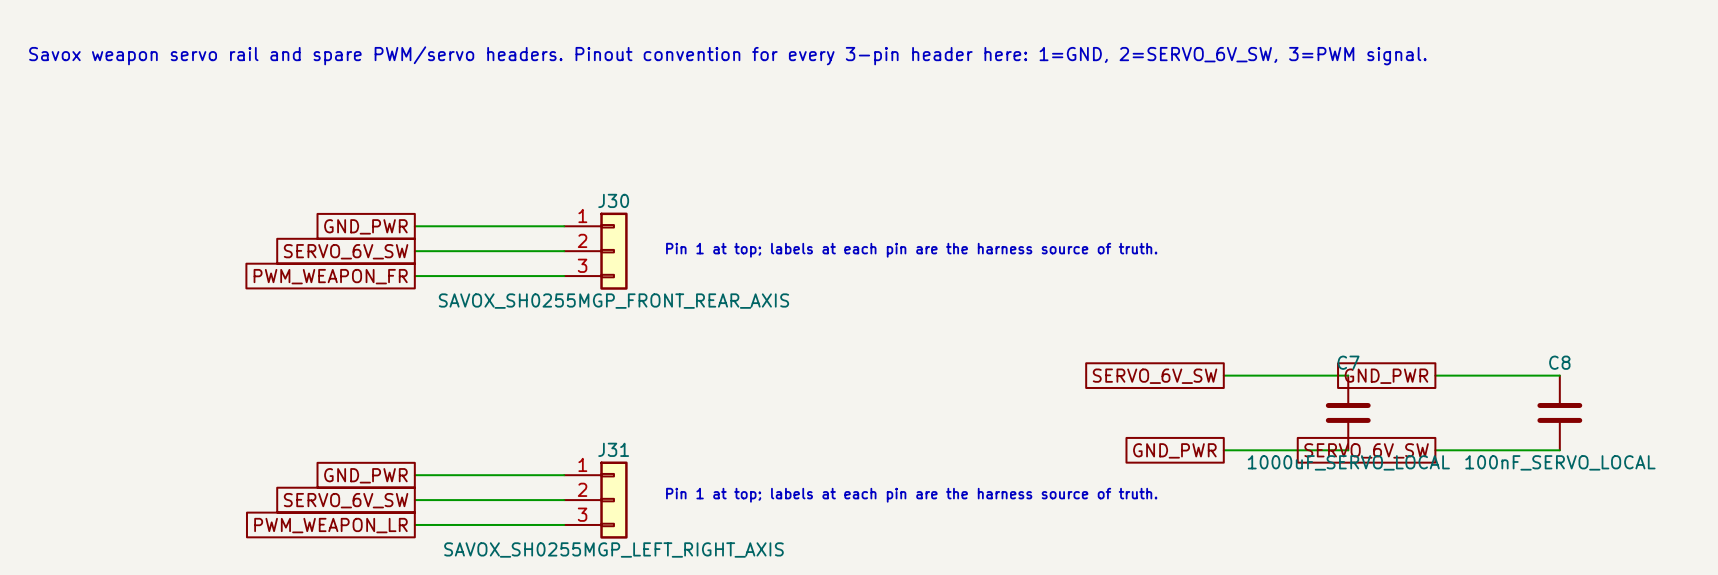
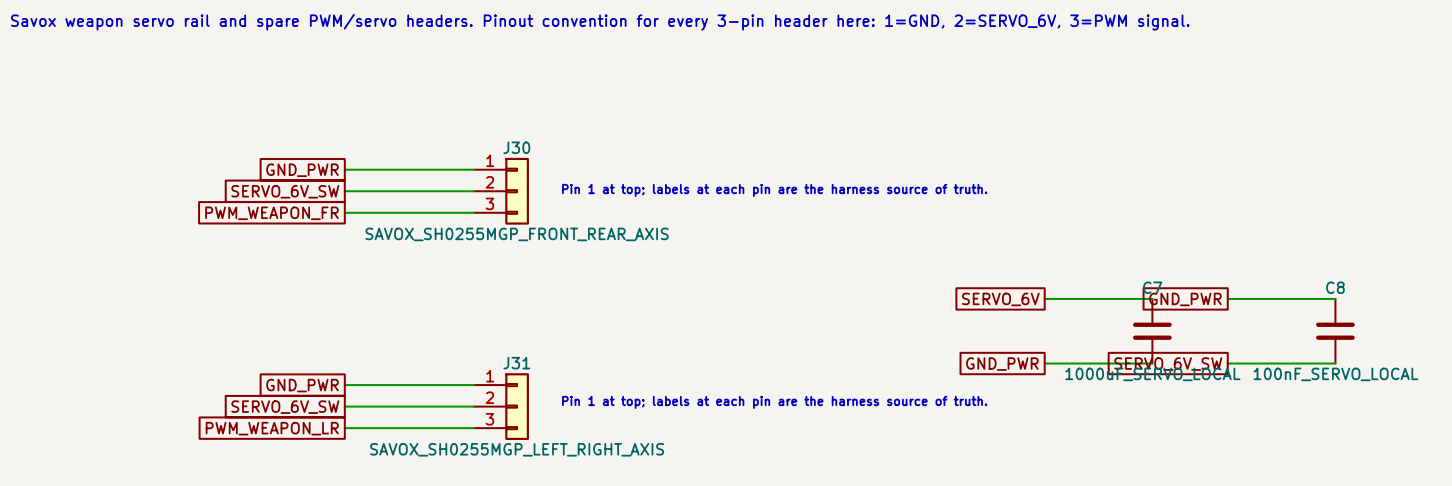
text: Savox weapon servo rail and spare PWM/servo headers. Pinout convention for every 3-pin header here: 1=GND, 2=SERVO_6V_SW, 3=PWM signal. (727, 55) -> Savox weapon servo rail and spare PWM/servo headers. Pinout convention for every 3-pin header here: 1=GND, 2=SERVO_6V, 3=PWM signal. (600, 22)
global label: SERVO_6V_SW (1155, 376) -> SERVO_6V (1000, 299)

